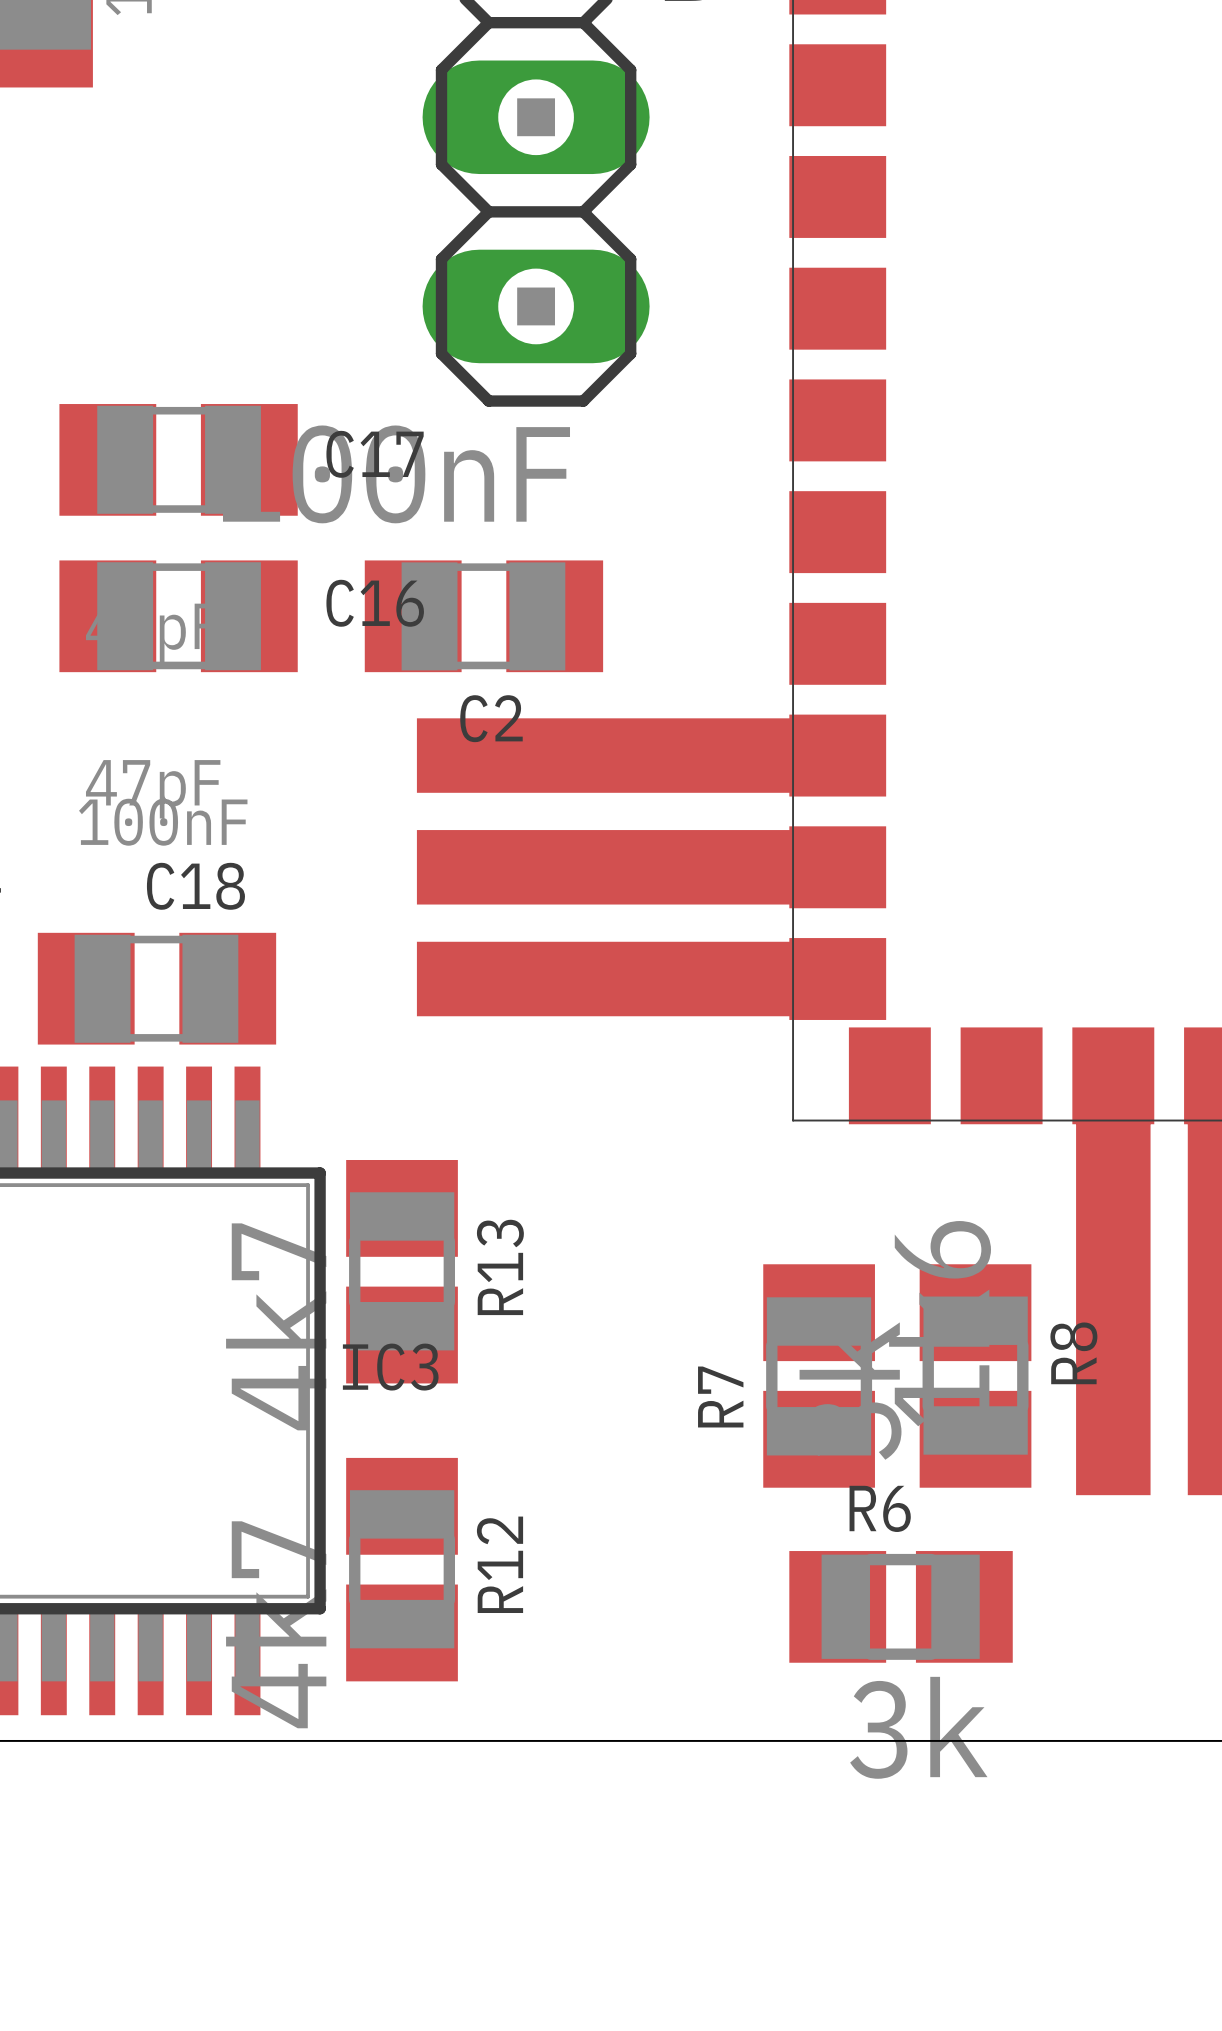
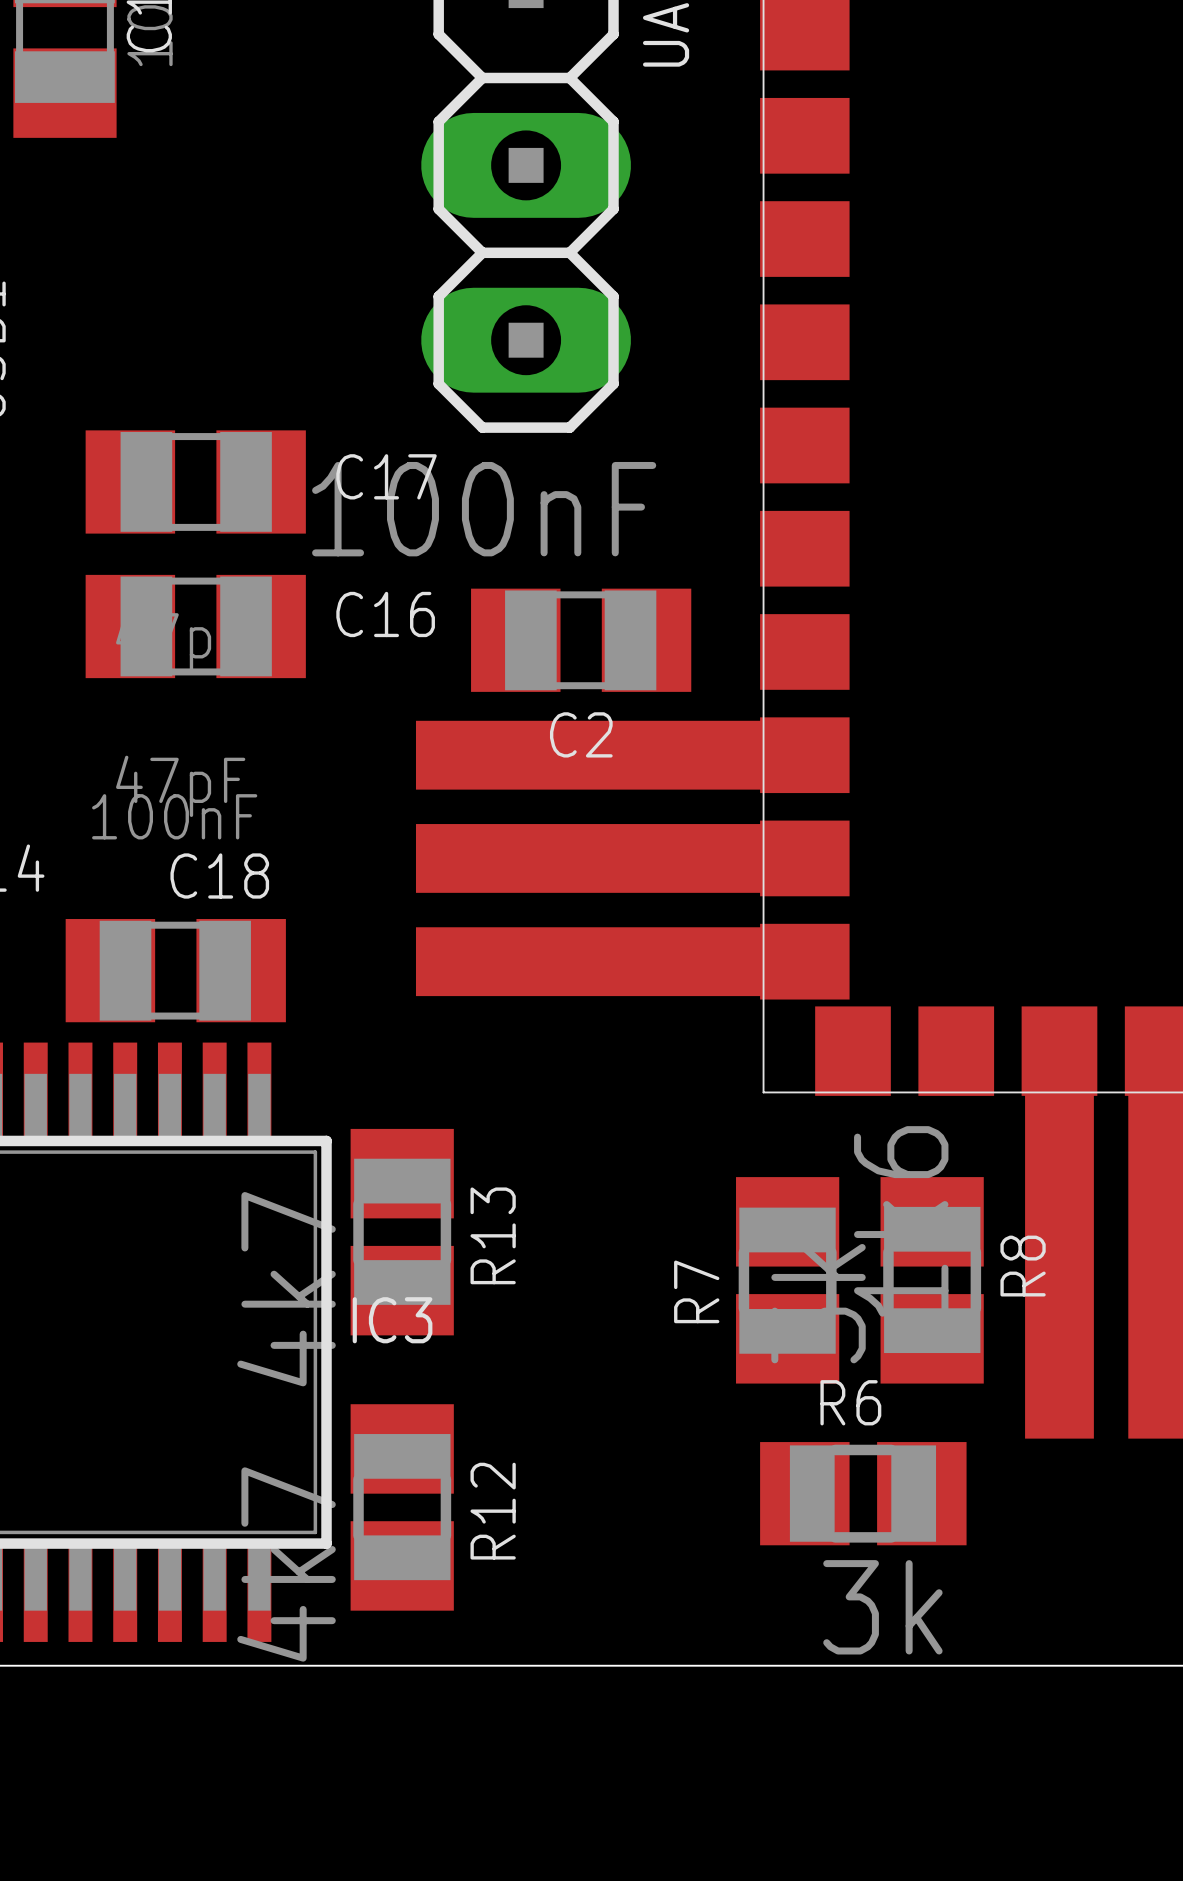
C2 position: (483, 616) -> (581, 640)
R7 position: (819, 1375) -> (787, 1280)
R8 position: (975, 1375) -> (932, 1280)
R6 position: (901, 1606) -> (863, 1493)

